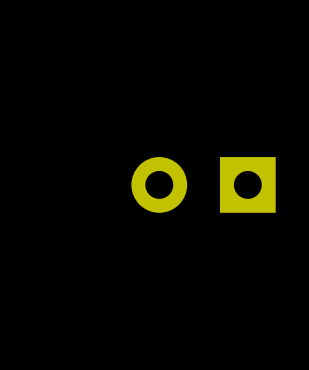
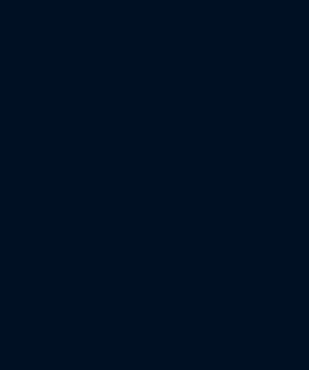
part: (203, 184) -> none

